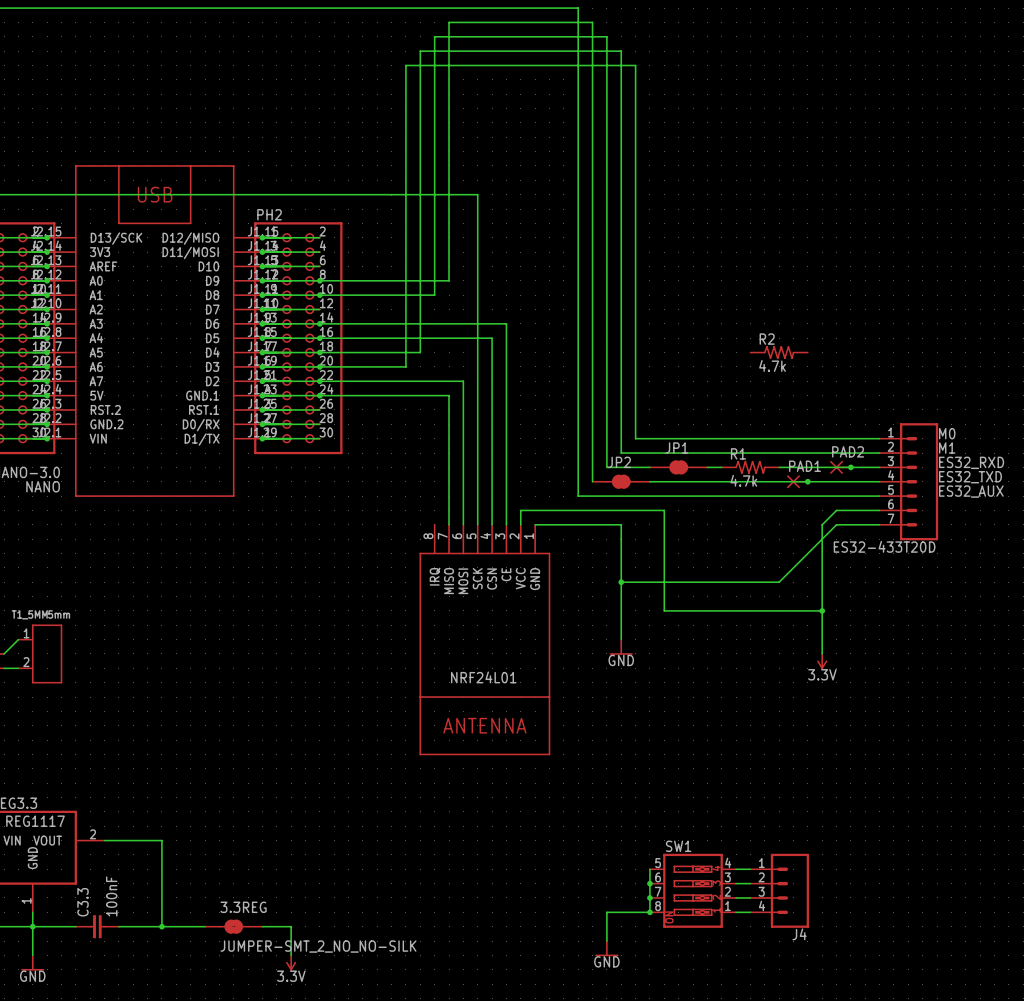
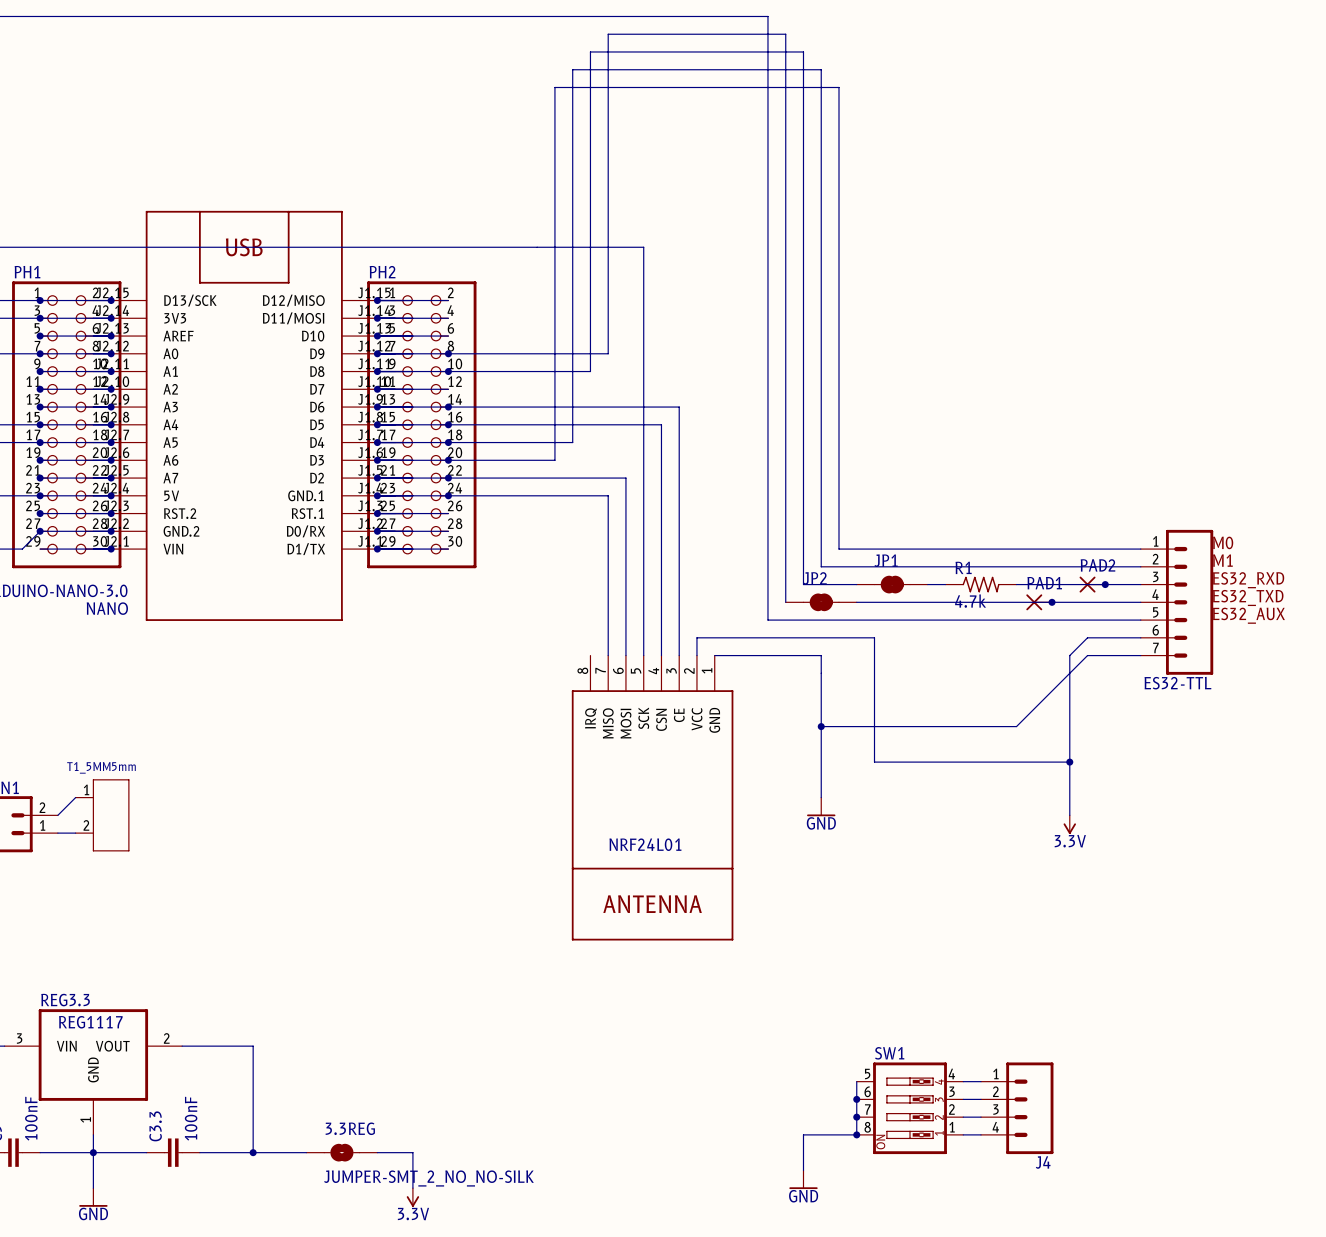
R2: 4.7k (779, 352) -> none
ES32-433T20D name: ES32-433T20D (884, 546) -> ES32-TTL (1177, 683)

